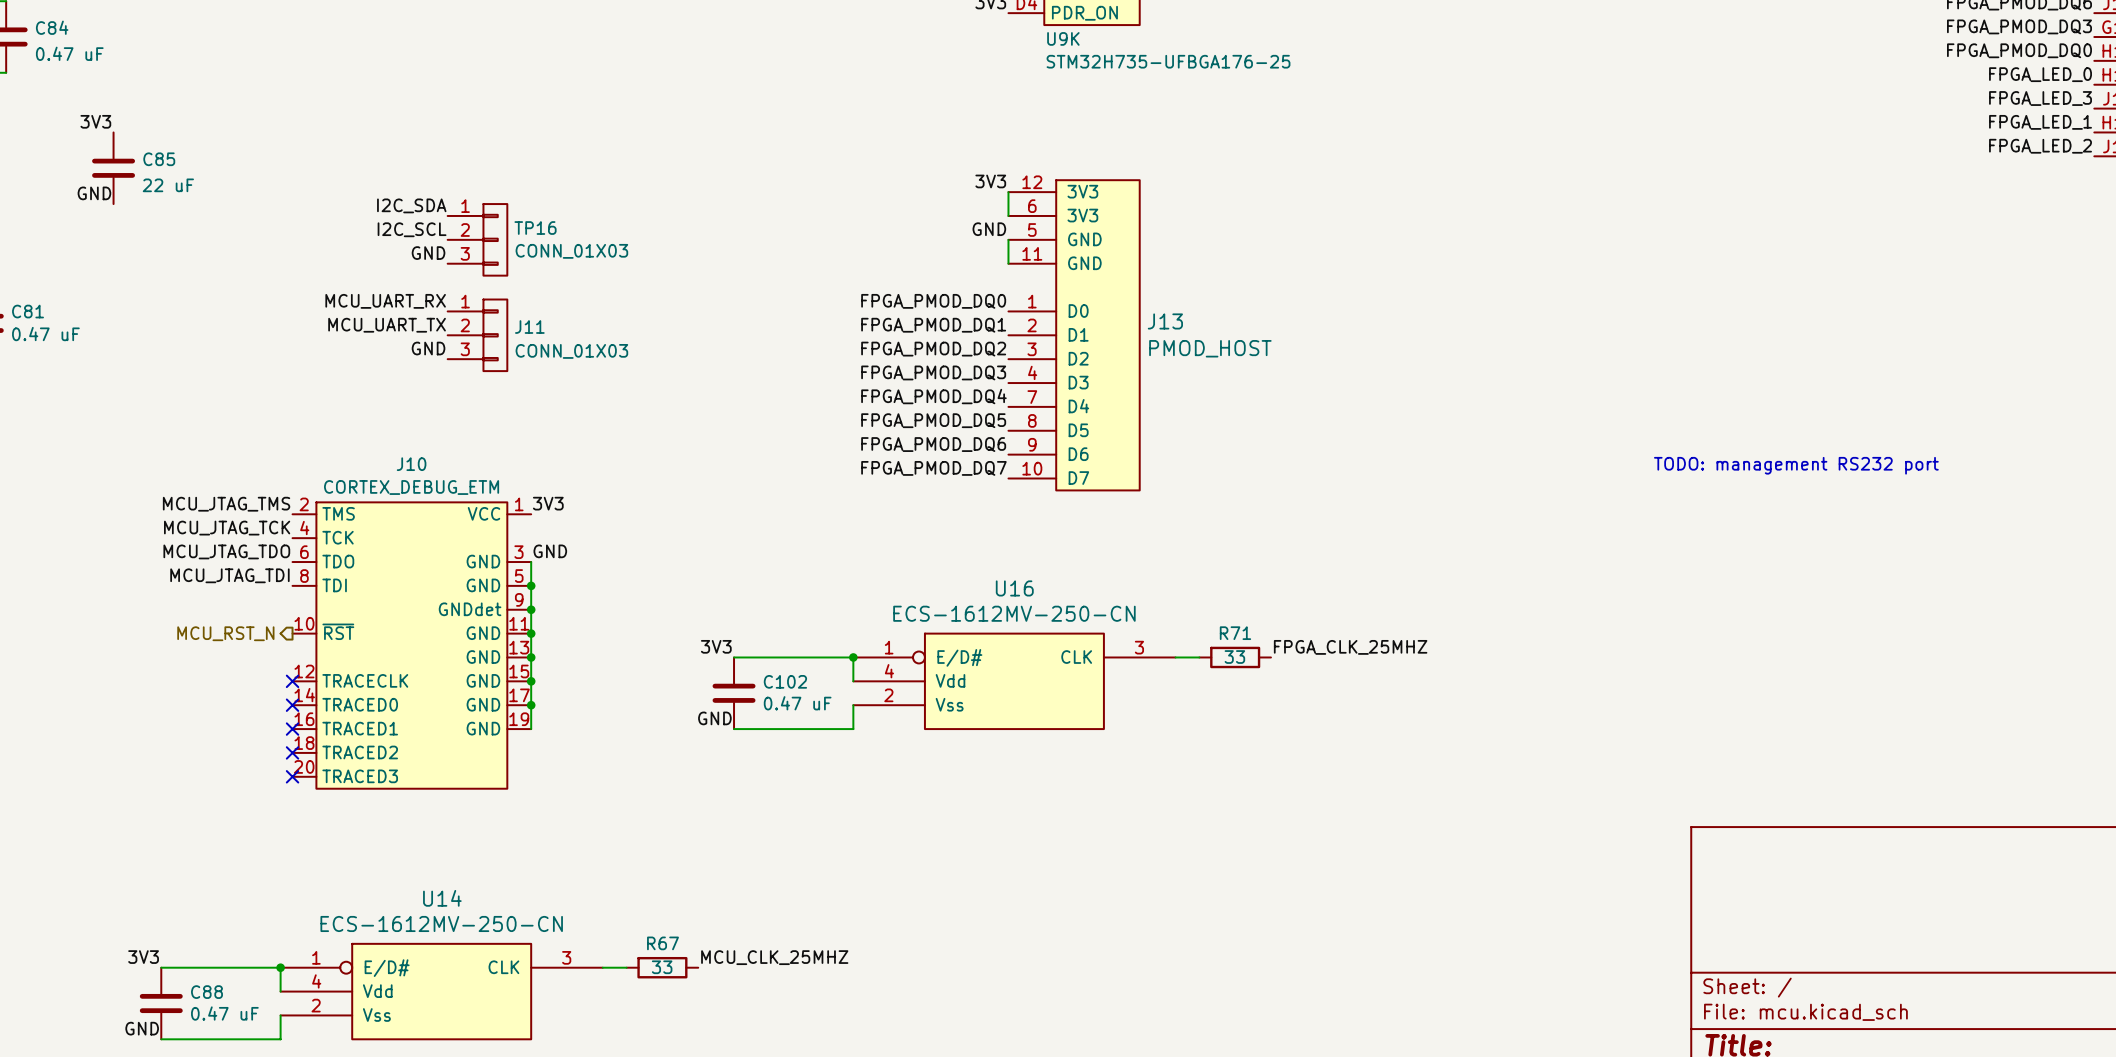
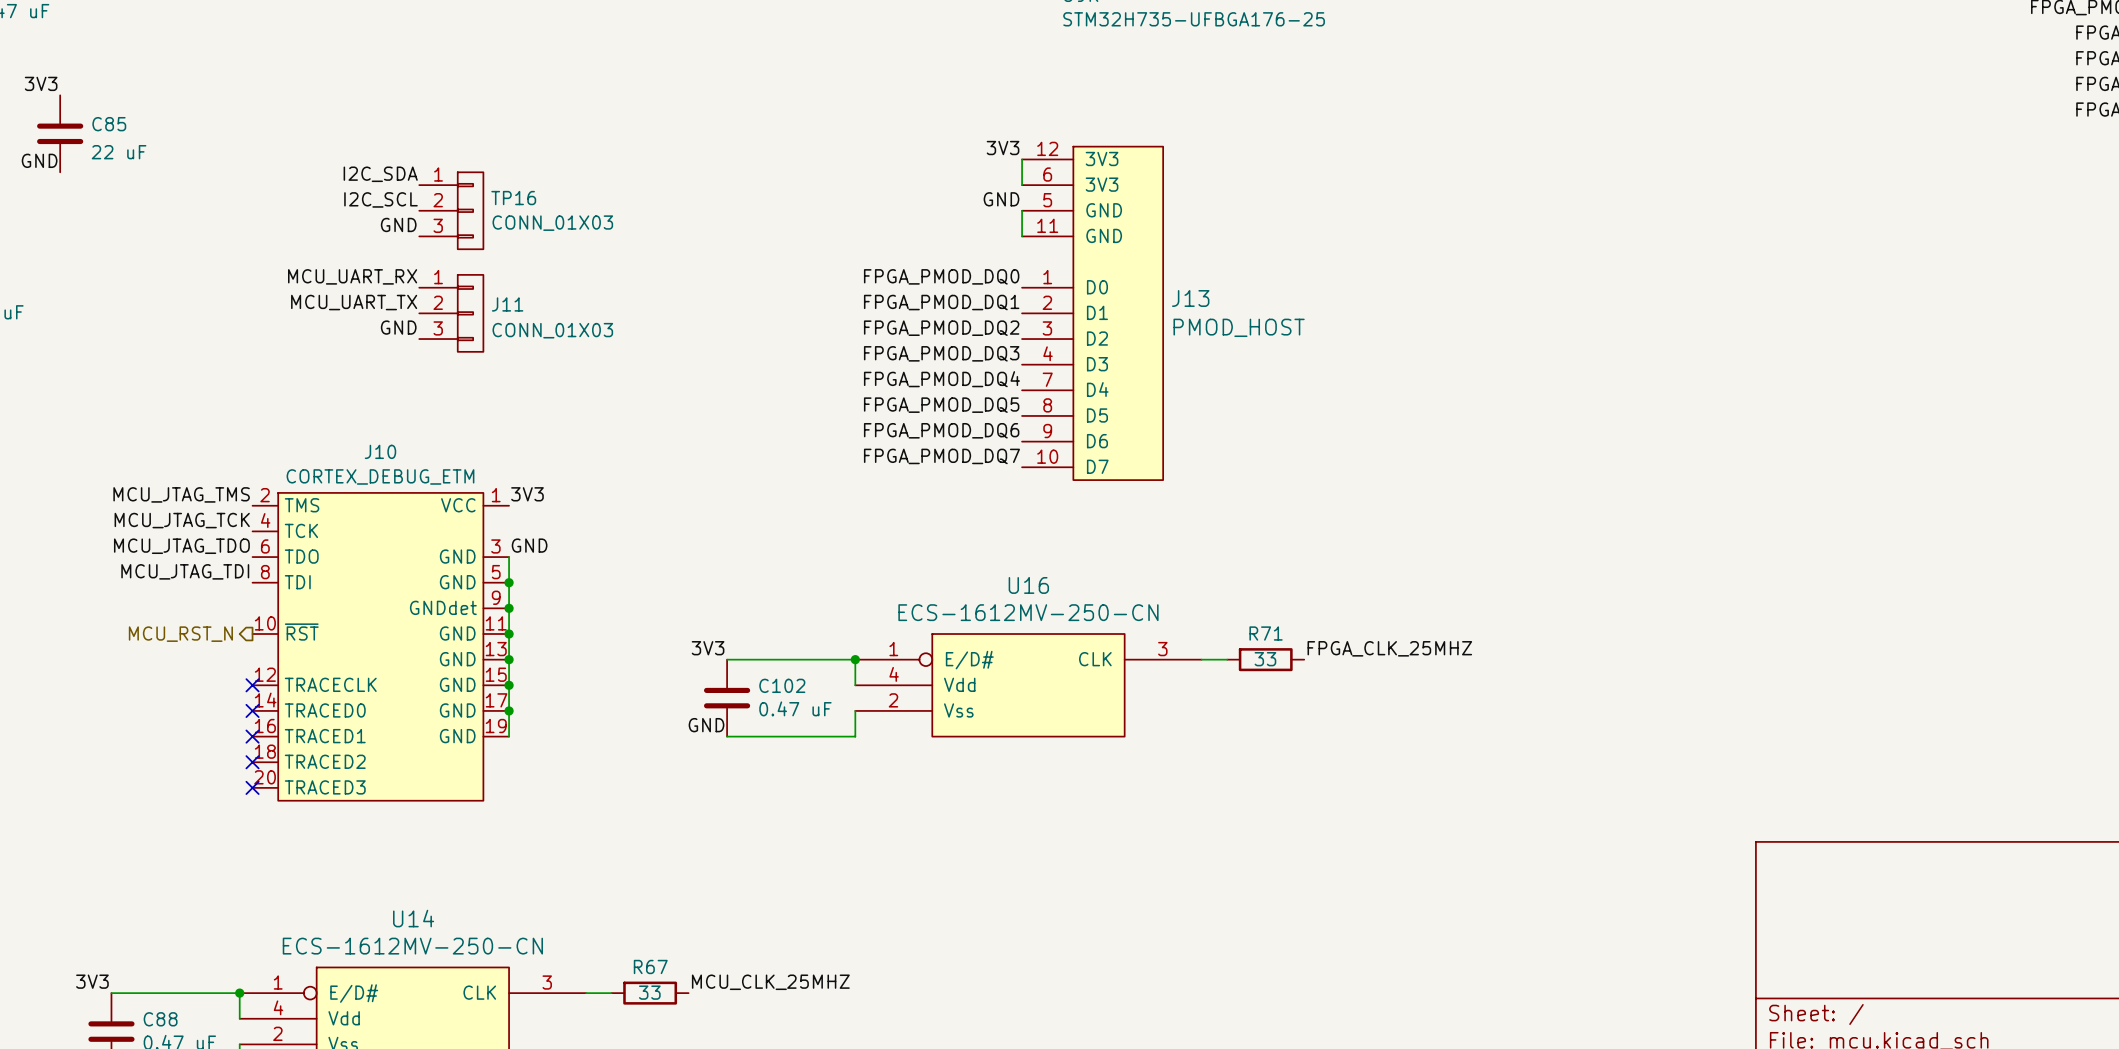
text: TODO: management RS232 port (1796, 465) -> none

